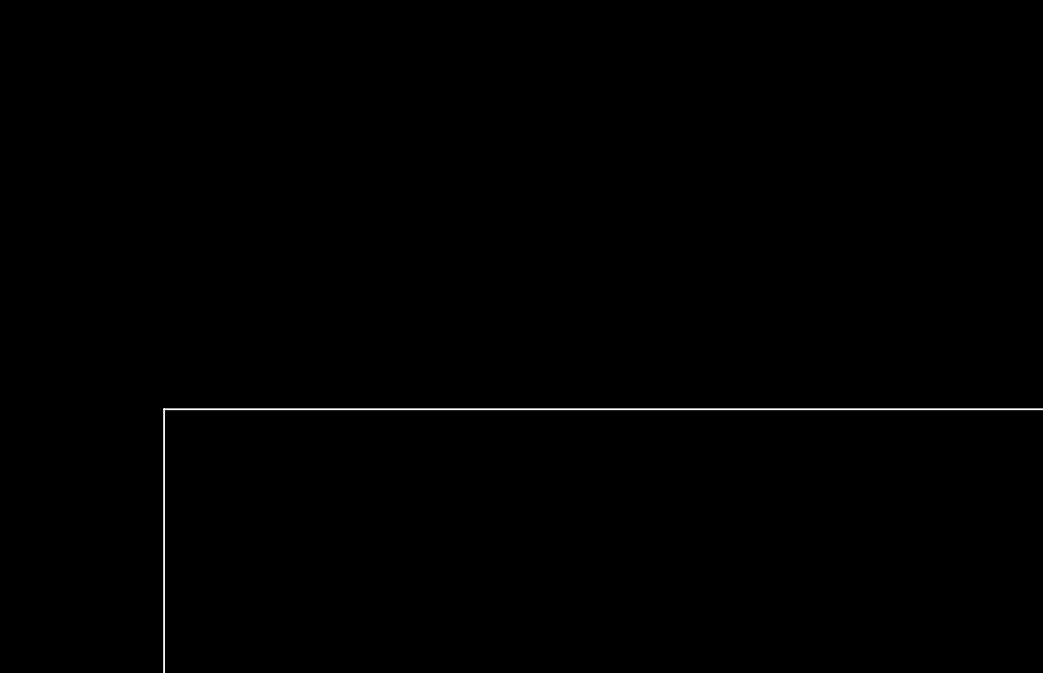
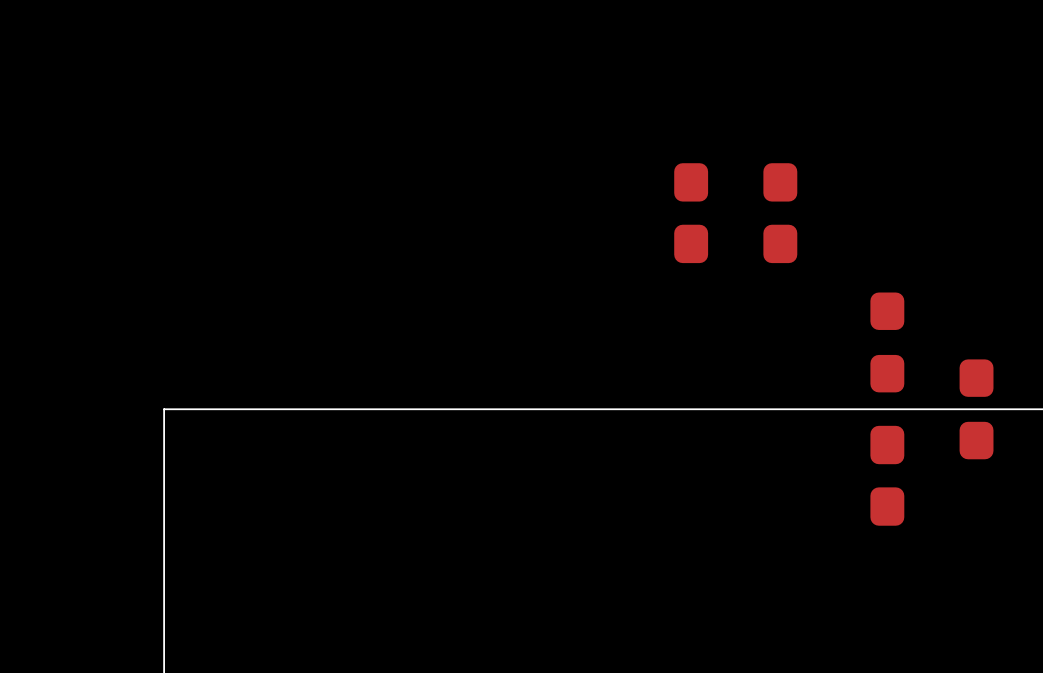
part: none -> (691, 213)
part: none -> (780, 213)
part: none -> (887, 342)
part: none -> (976, 409)
part: none -> (887, 475)

